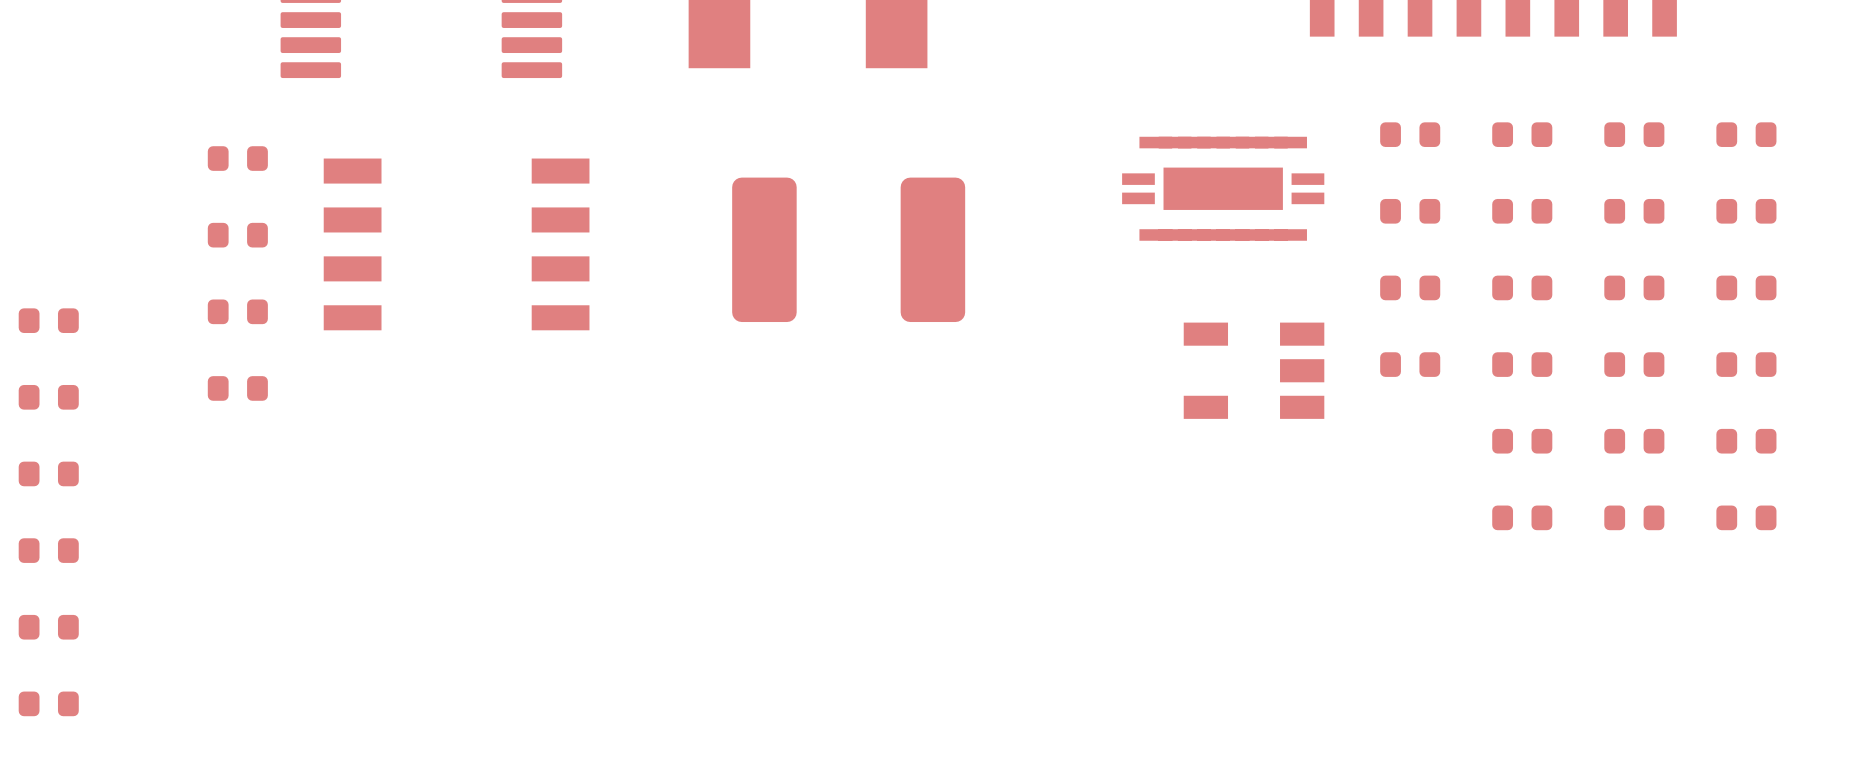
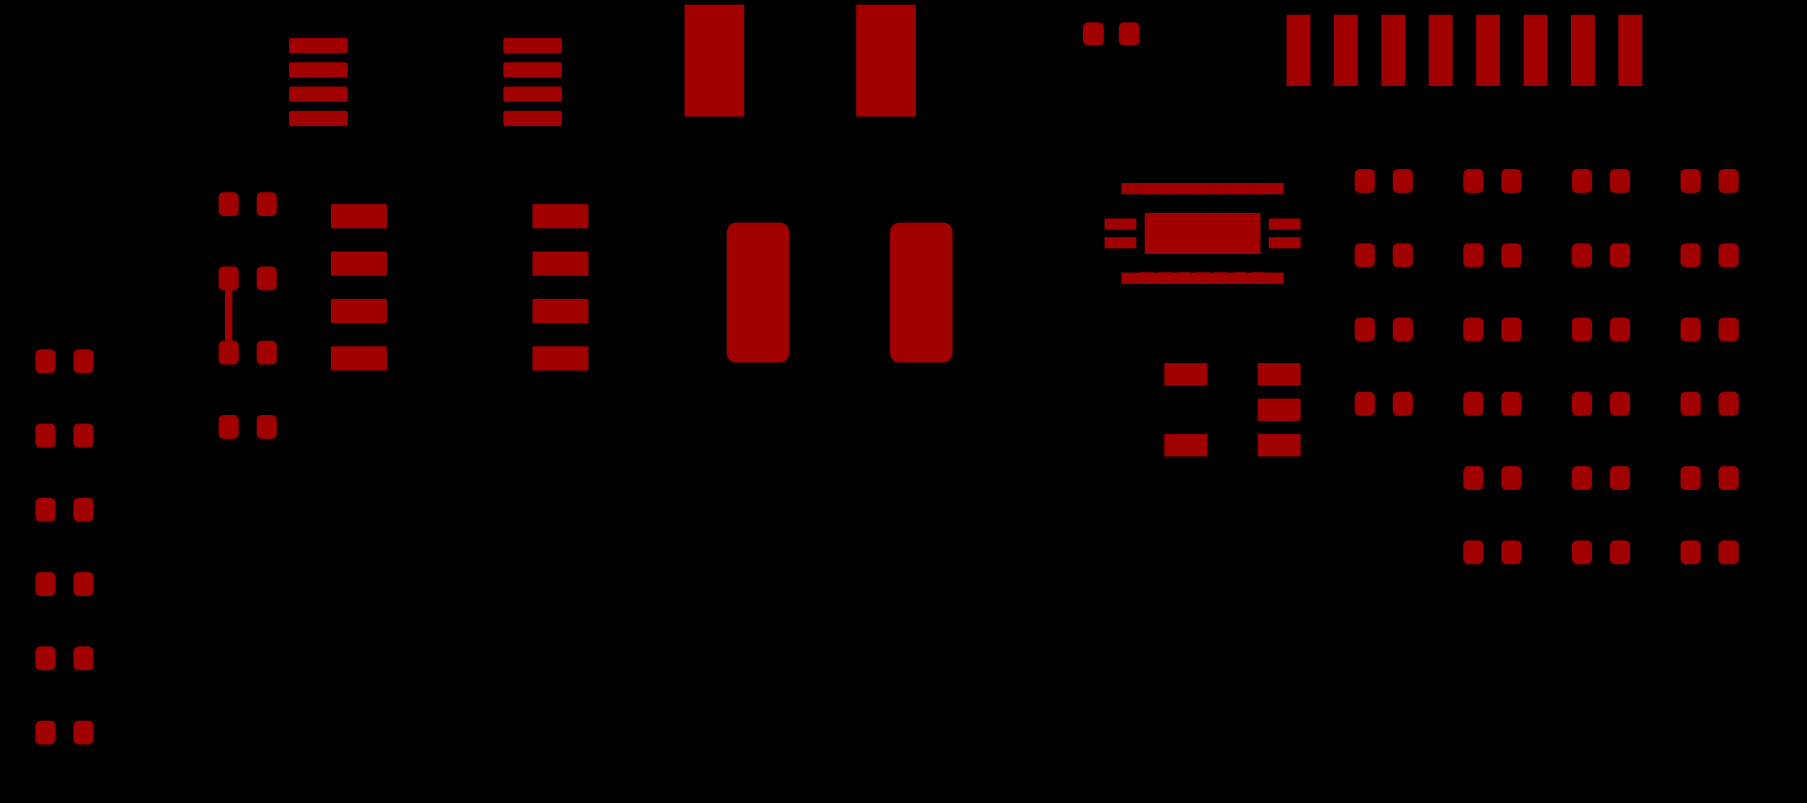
top track: none -> (228, 278) (228, 352)

